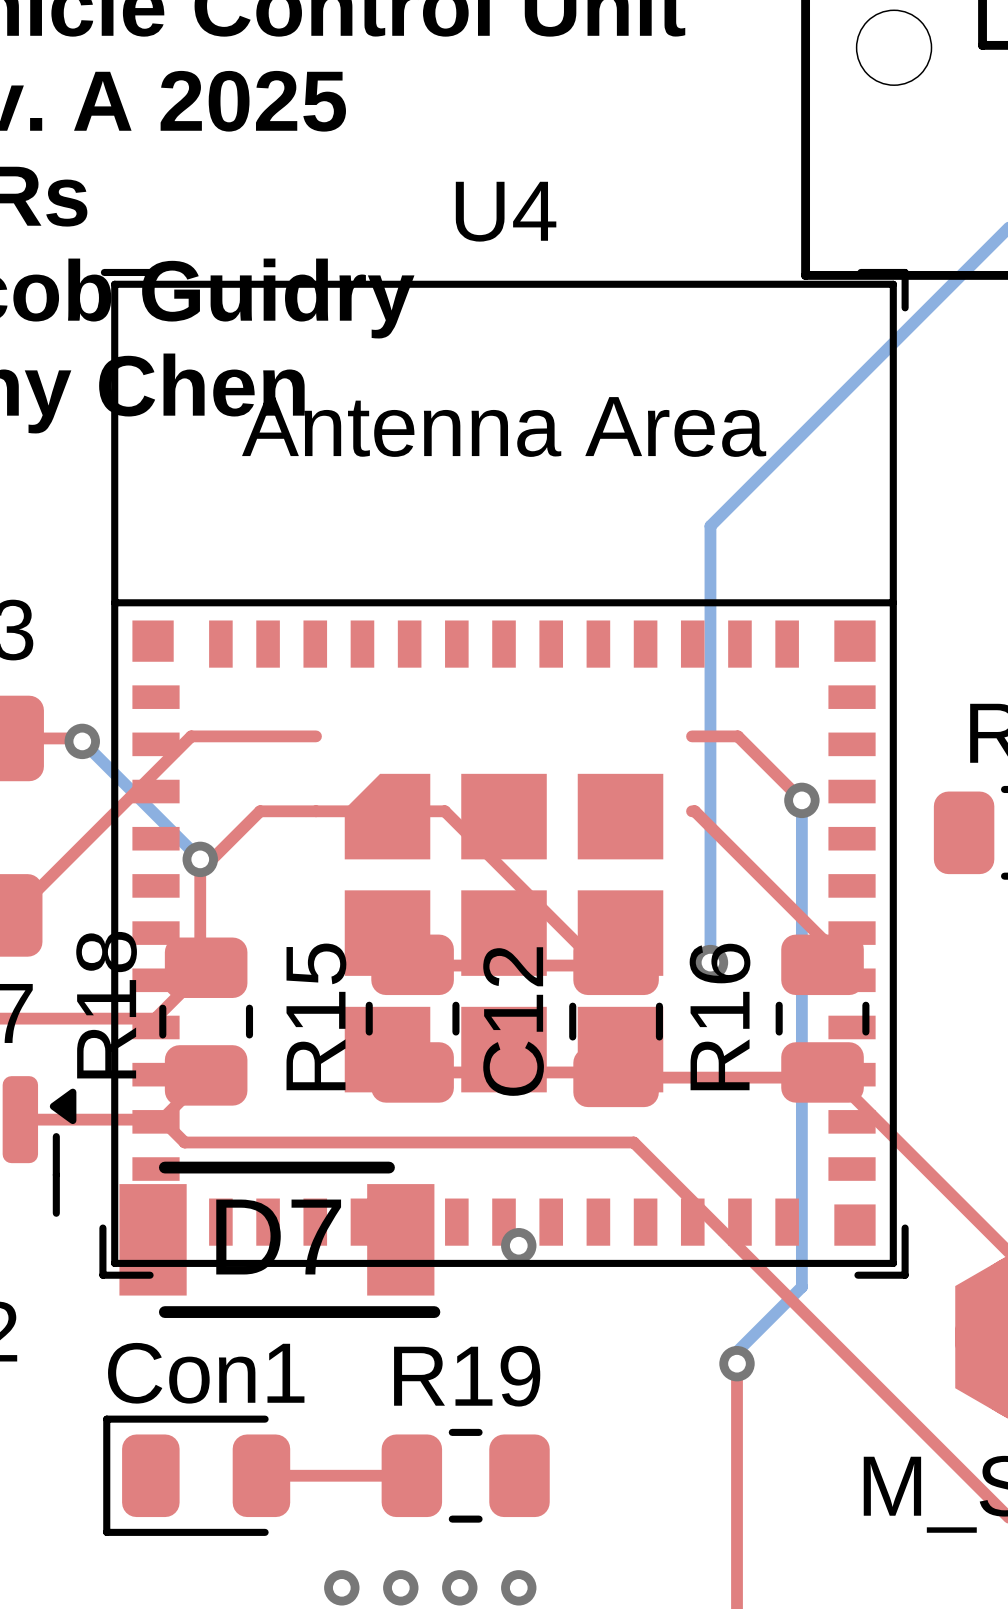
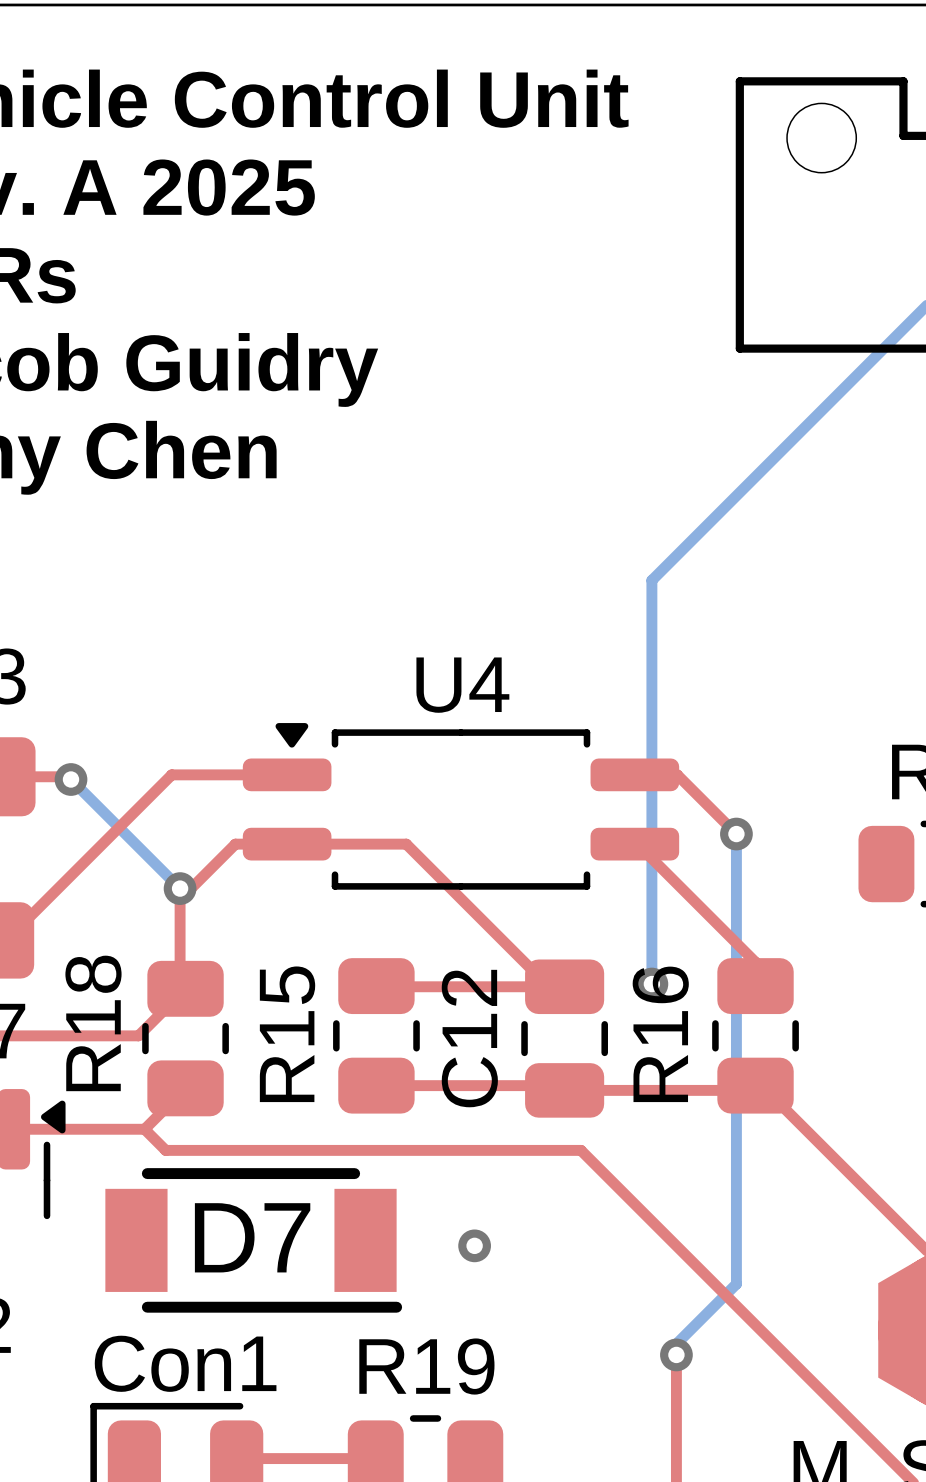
U4 name position: U4 (506, 211) -> U4 (462, 685)
U4 footprint: [99, 268, 909, 1279] -> [242, 723, 680, 890]

